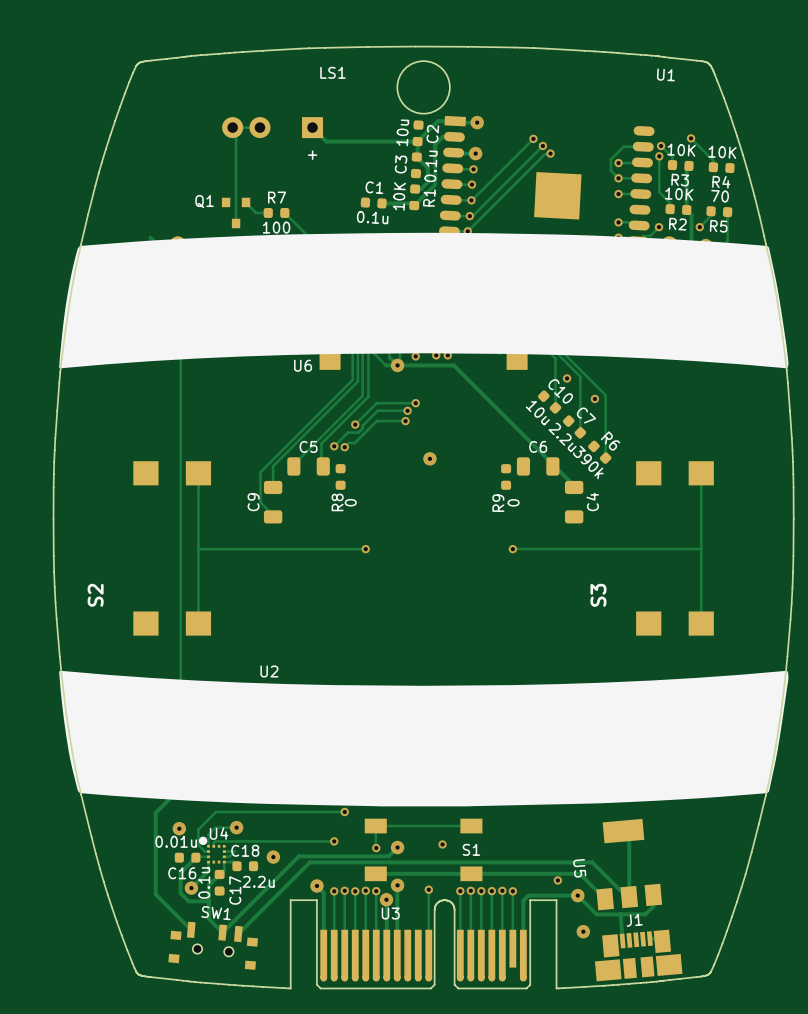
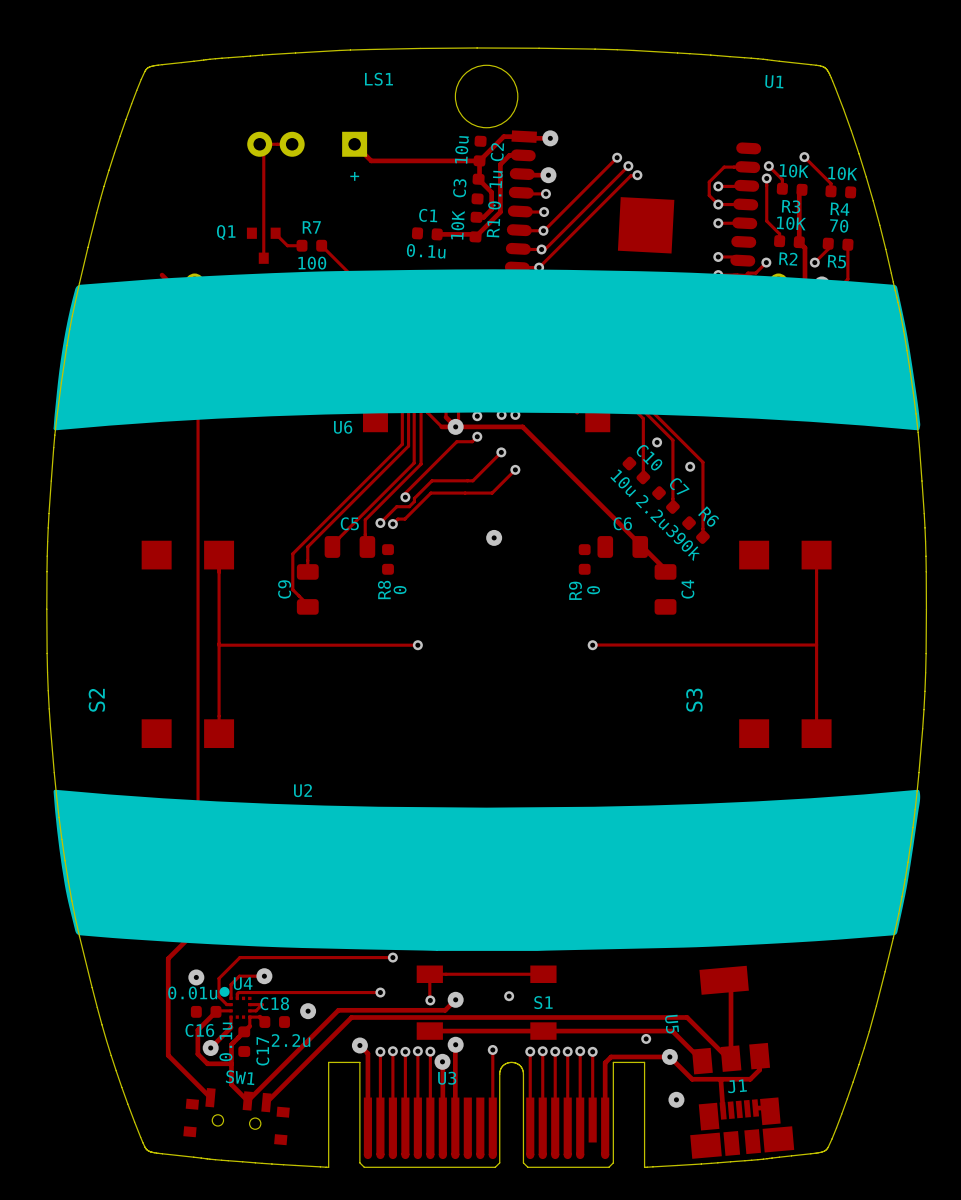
track: none -> (477, 436) (472, 441) (456, 441) (405, 493)
via: none -> (477, 436)
track: none -> (501, 452) (472, 480) (467, 480)
via: none -> (501, 452)
track: none -> (515, 469) (492, 493) (465, 493)
via: none -> (515, 469)
track: (415, 403) (376, 403) (355, 424) -> none
via: (415, 403) -> none
via: (407, 410) -> none
via: (405, 421) -> none

